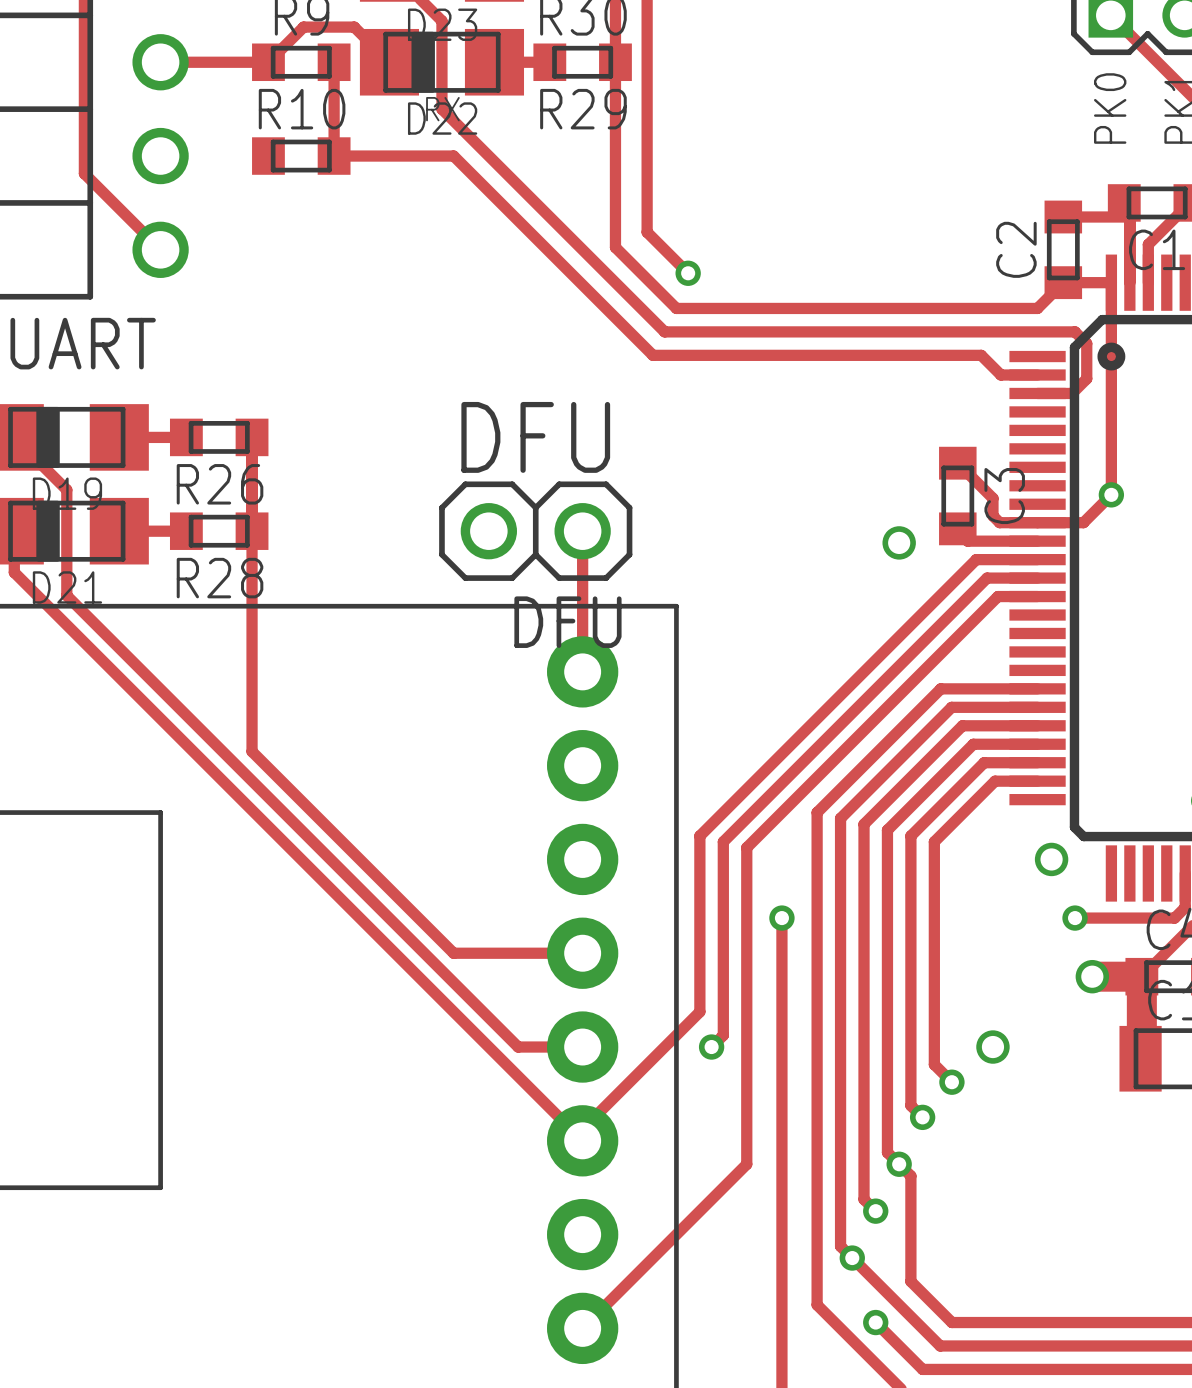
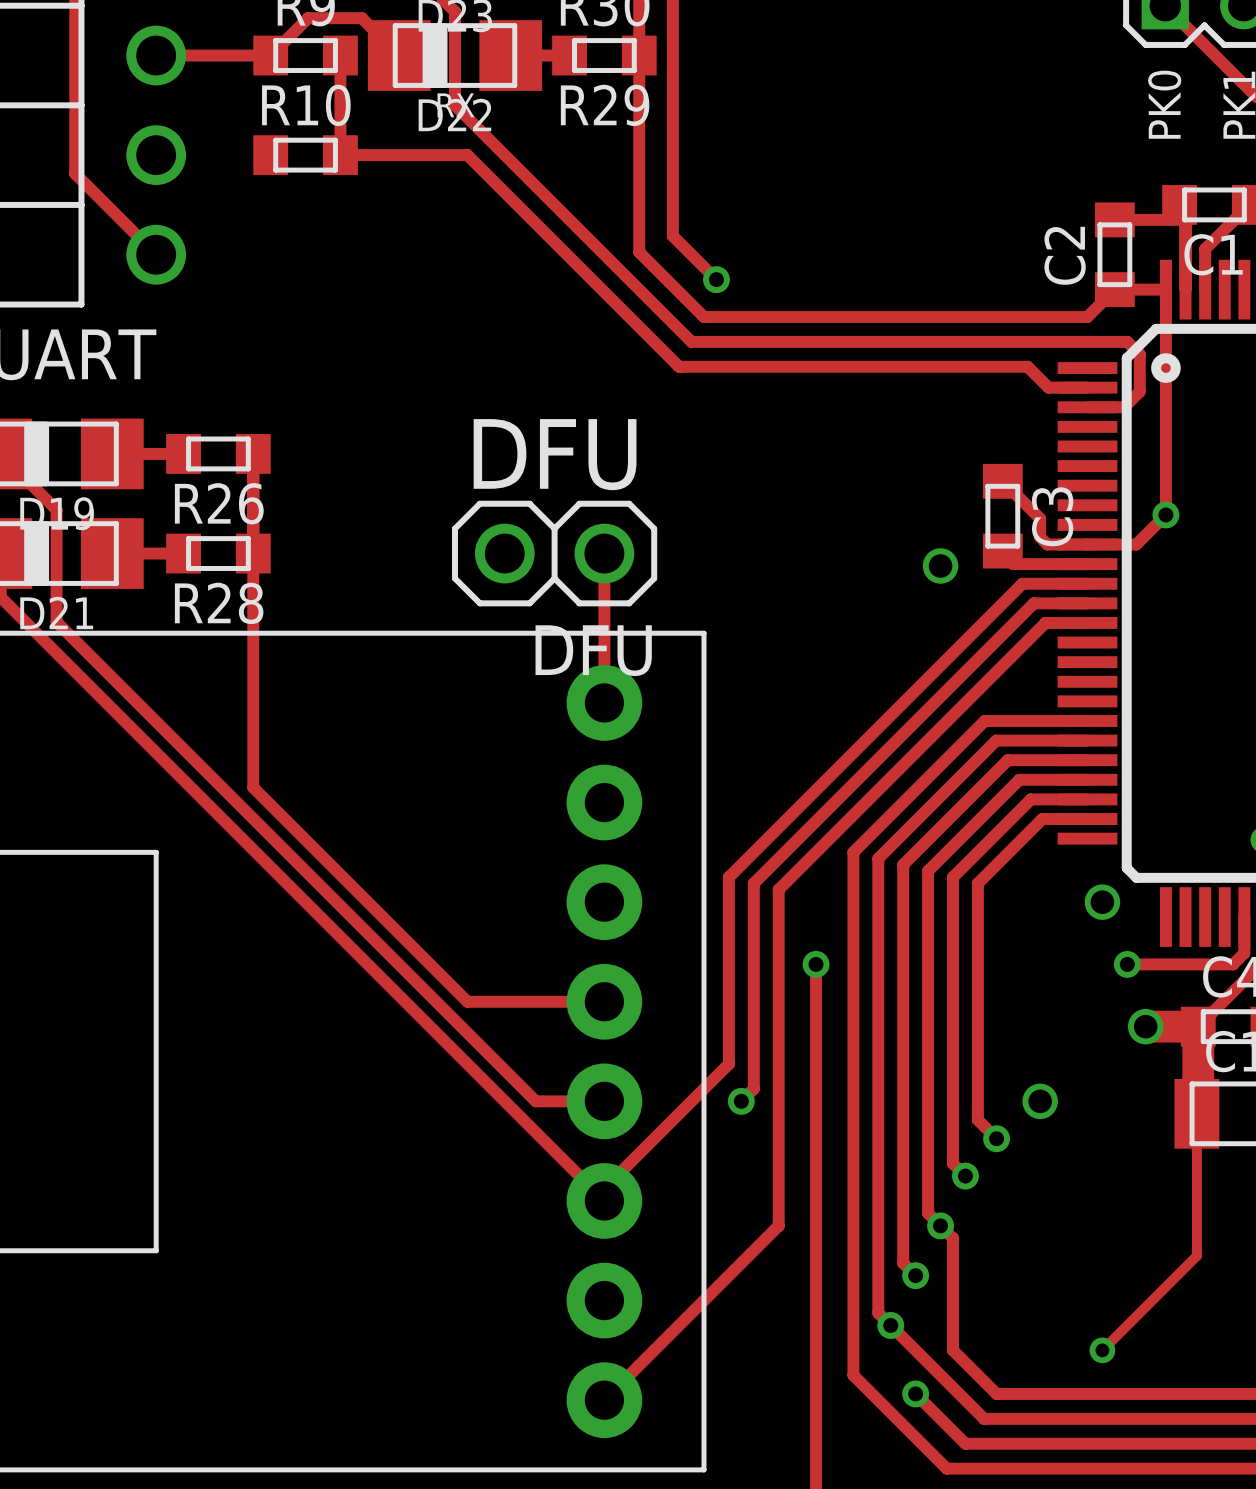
track: none -> (1196, 1113) (1196, 1255) (1102, 1350)
via: none -> (1102, 1350)

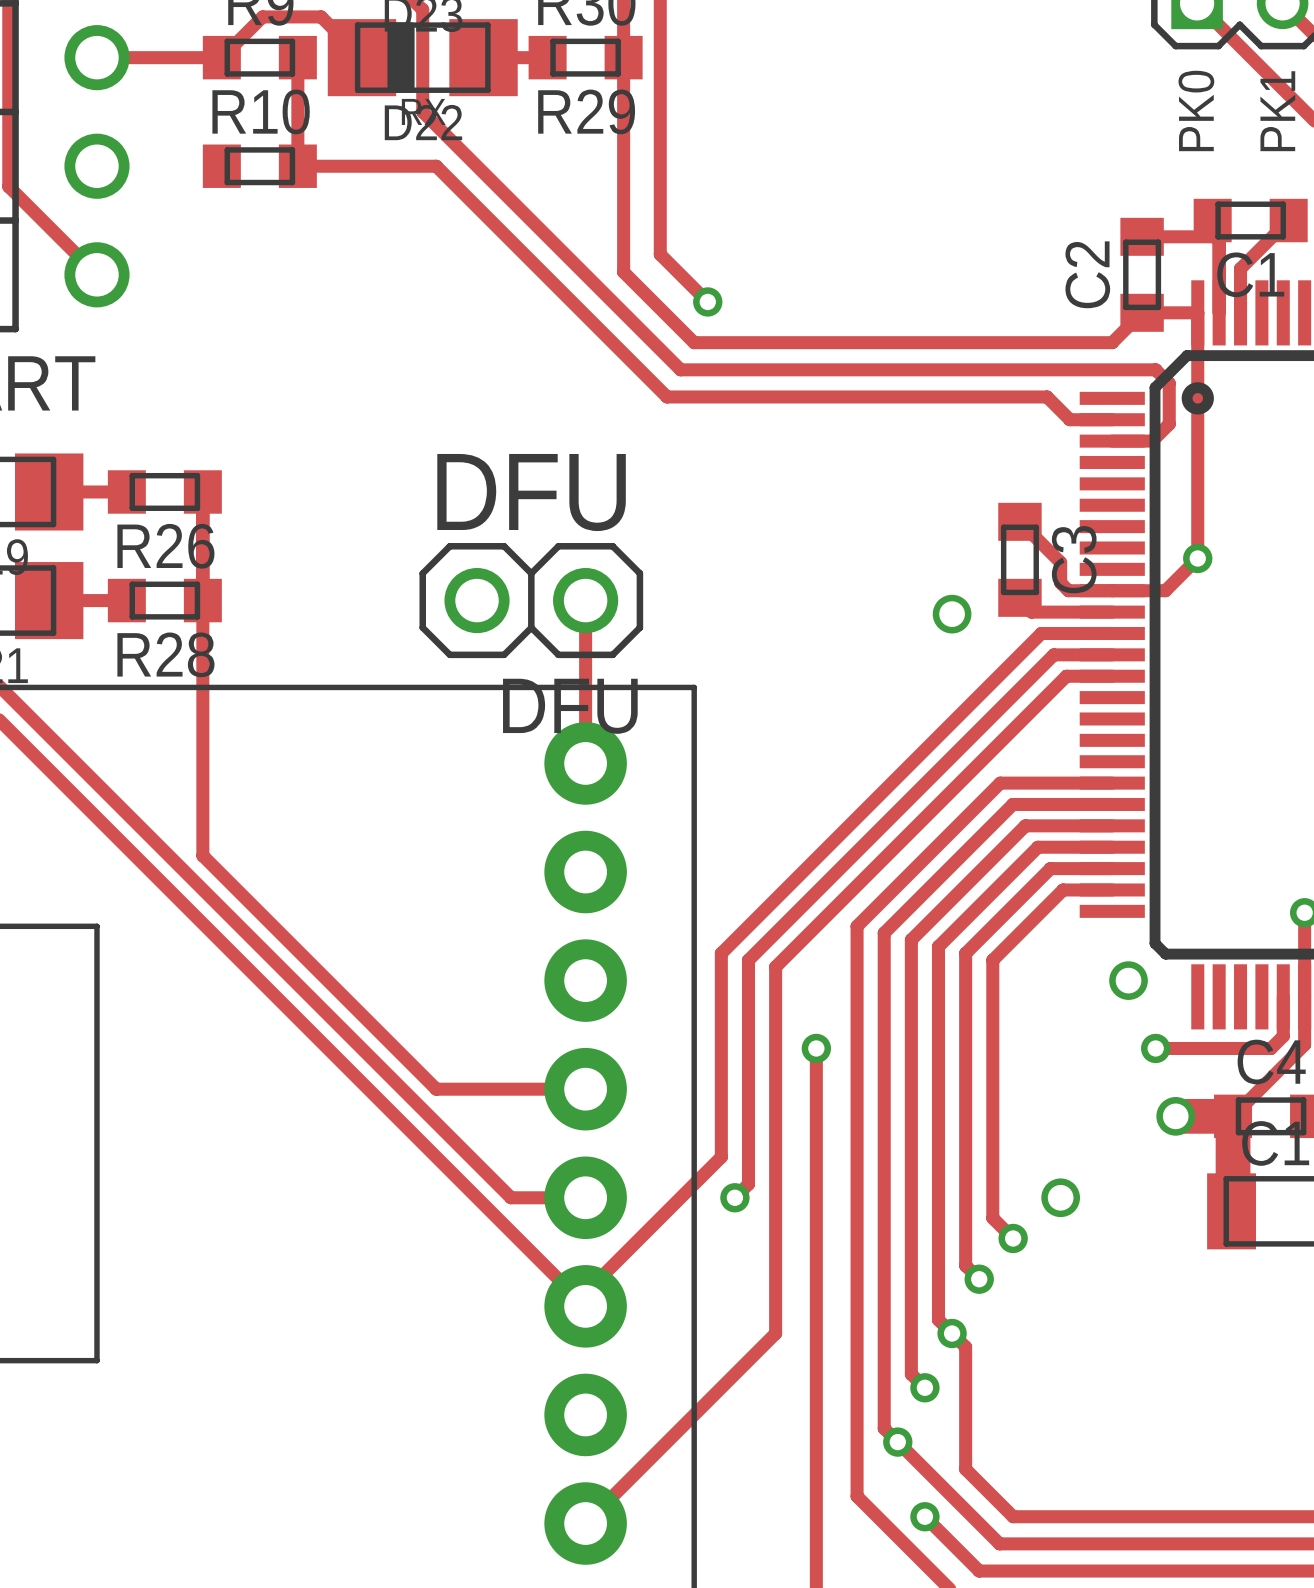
track: (1196, 1113) (1196, 1255) (1102, 1350) -> none
via: (1102, 1350) -> none

